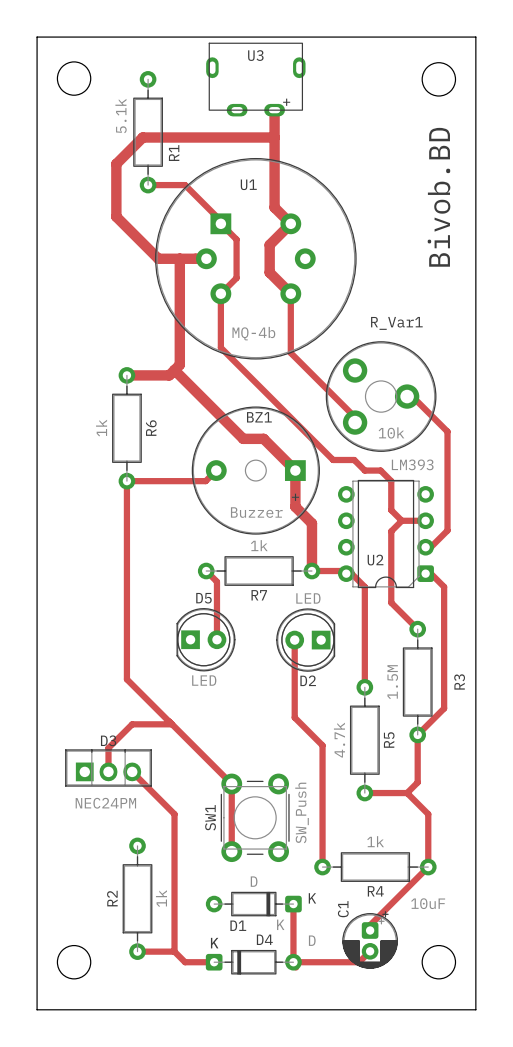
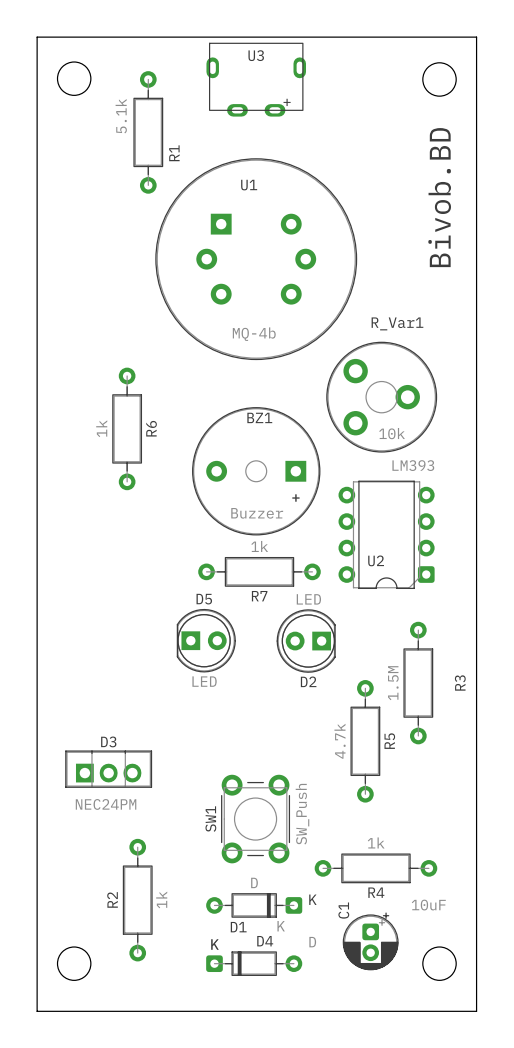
track: (274, 110) (274, 207) (290, 223) (269, 244) (269, 272) (290, 293) (290, 353) (360, 422) -> none
track: (274, 137) (142, 137) (116, 163) (116, 216) (158, 258) (206, 258) -> none
track: (148, 185) (185, 185) (236, 239) (236, 278) (220, 293) (220, 347) (333, 459) (354, 459) (364, 470) (380, 470) (391, 481) (391, 510) (401, 520) -> none
track: (179, 258) (179, 364) (169, 375) (126, 375) -> none
track: (174, 370) (243, 438) (263, 438) (295, 470) (295, 506) (311, 523) (311, 571) (348, 571) (364, 586) (364, 687) -> none
track: (407, 396) (412, 396) (447, 431) (447, 530) (430, 547) -> none
track: (216, 470) (205, 481) (126, 481) (126, 679) (169, 721) -> none
track: (401, 520) (425, 520) -> none
track: (401, 520) (391, 531) (391, 602) (417, 629) -> none
track: (206, 571) (216, 581) (216, 639) -> none
track: (430, 573) (444, 586) (444, 708) (417, 734) (417, 782) (407, 793) -> none
track: (294, 640) (294, 717) (322, 745) (322, 867) -> none
track: (169, 721) (231, 783) (231, 851) -> none
track: (172, 724) (132, 724) (108, 748) (108, 769) (111, 771) (108, 771) -> none
track: (132, 771) (174, 814) (174, 951) -> none
track: (364, 793) (407, 793) -> none
track: (407, 793) (428, 814) (428, 867) (370, 925) (370, 930) -> none
track: (293, 904) (293, 964) (296, 967) -> none
track: (137, 951) (174, 951) -> none
track: (174, 951) (185, 962) (214, 962) -> none
track: (370, 951) (359, 962) (293, 962) -> none

